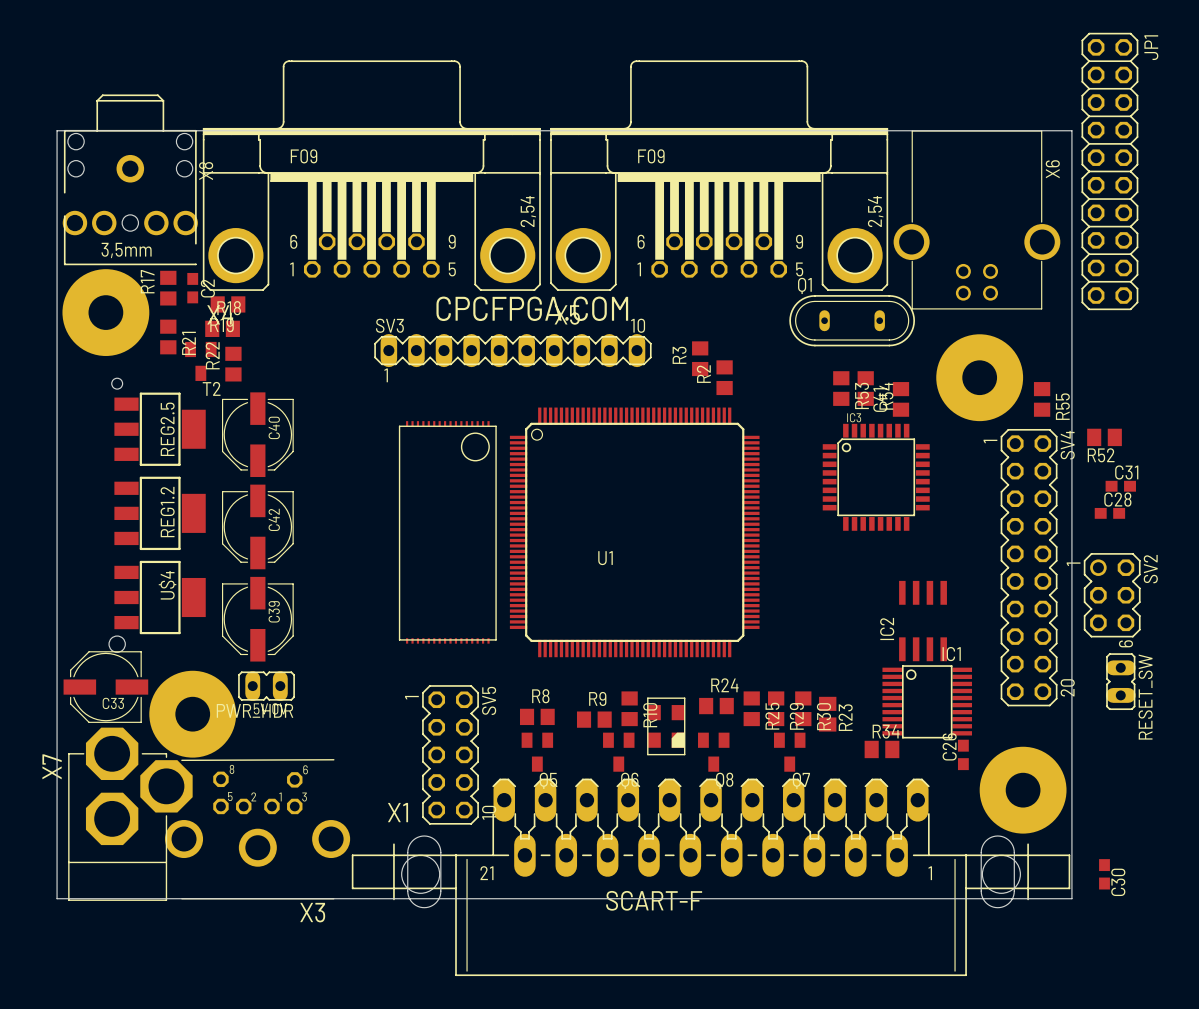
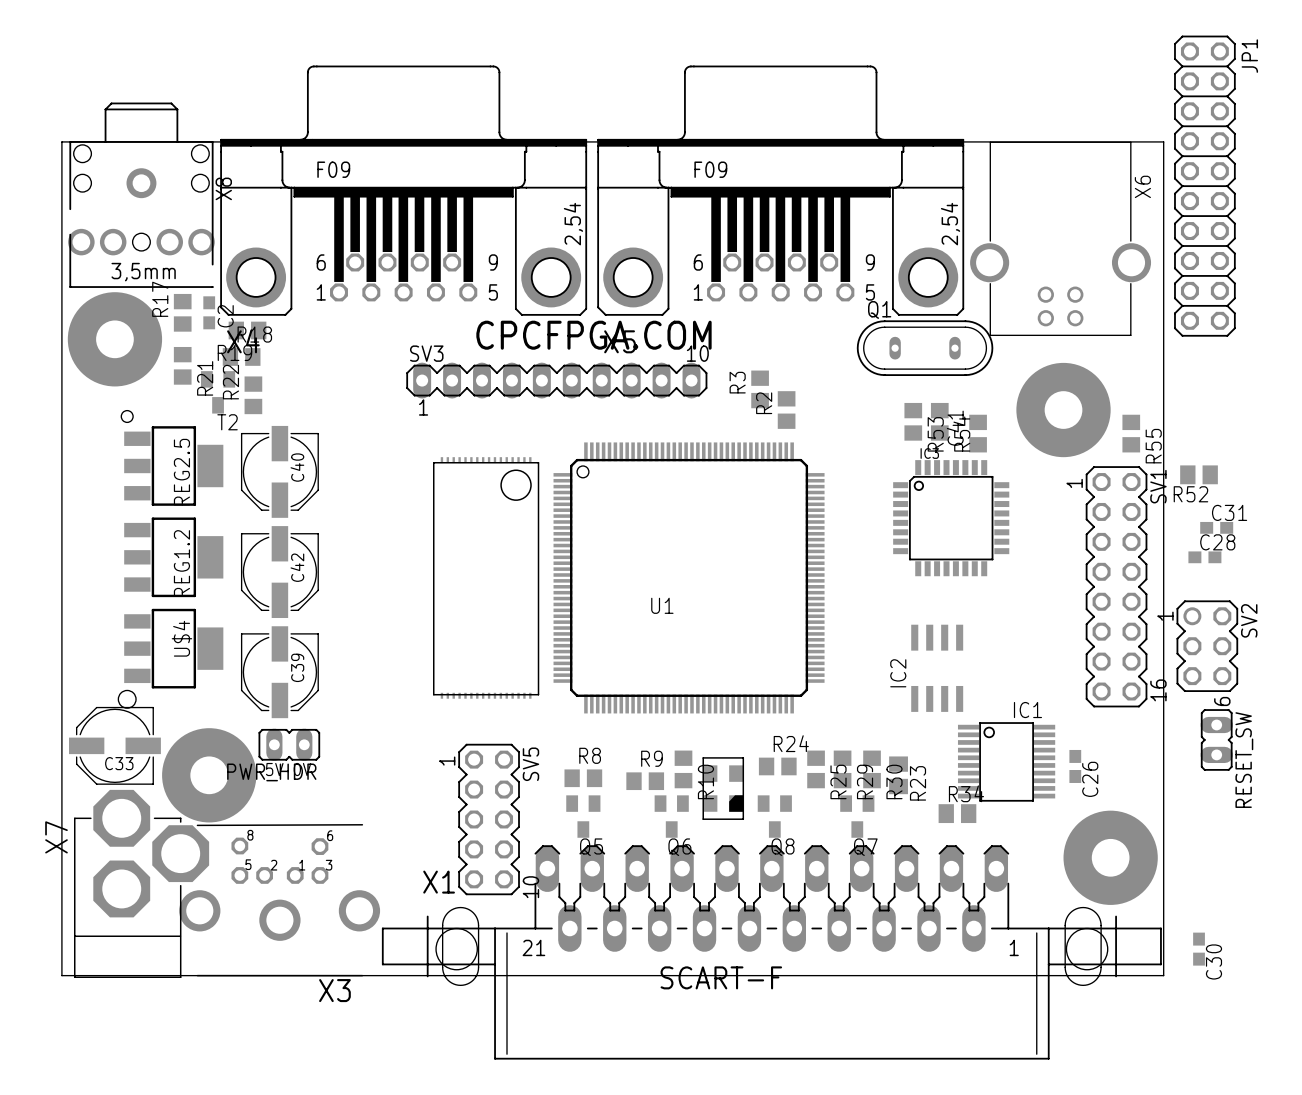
SV1: none -> (1116, 586)
SV4: (1029, 567) -> none
IC2 position: (923, 621) -> (937, 668)
C26 name position: C26 (949, 746) -> C26 (1090, 779)
C26 position: (963, 754) -> (1075, 766)

